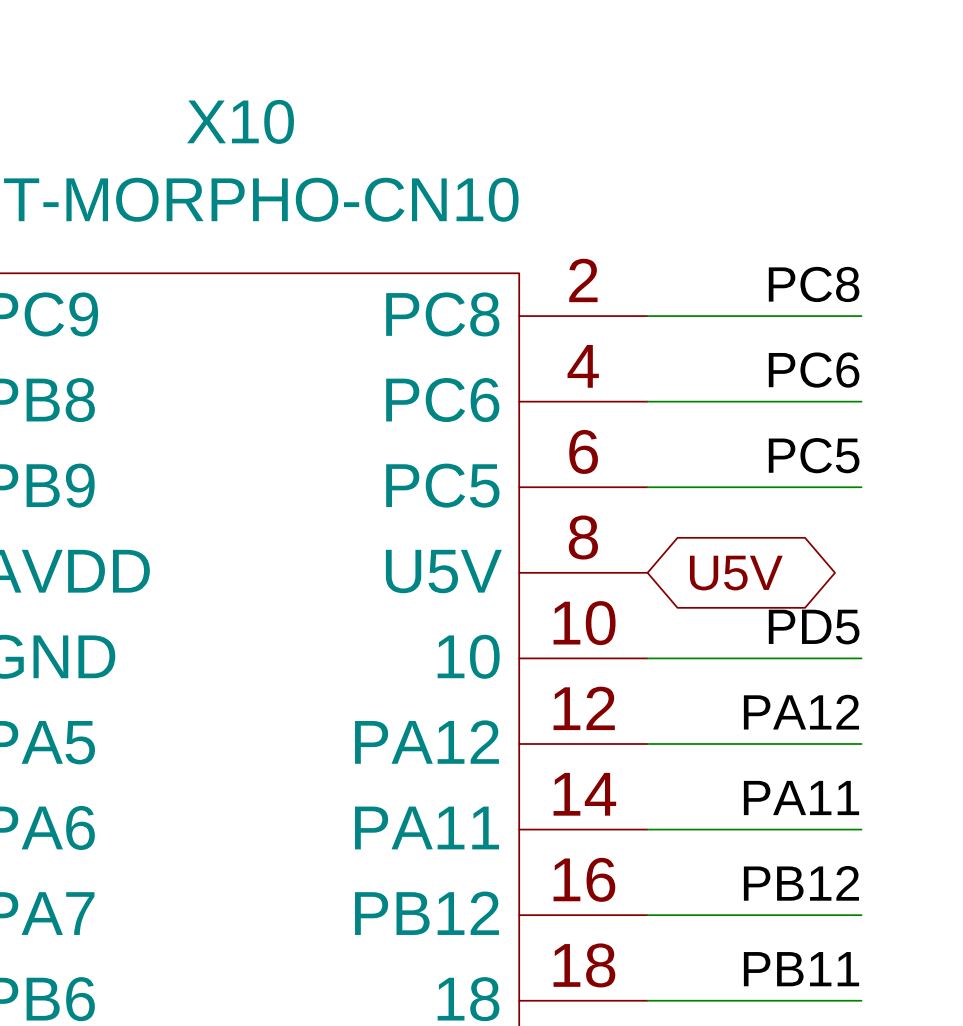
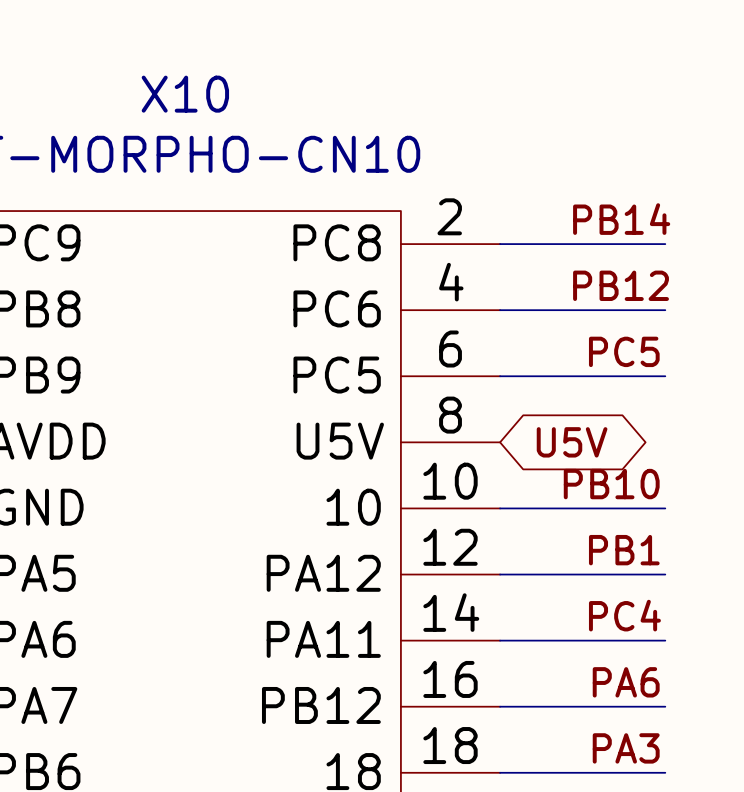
label: none -> PB14 (621, 219)
label: PC8 (814, 284) -> none
label: none -> PB12 (621, 285)
label: PC6 (814, 370) -> none
label: PD5 (814, 627) -> PB10 (611, 484)
label: PA12 (801, 712) -> PB1 (624, 550)
label: PA11 (801, 798) -> PC4 (624, 615)
label: PB12 (801, 883) -> PA6 (626, 682)
label: PB11 (801, 969) -> PA3 (626, 748)

